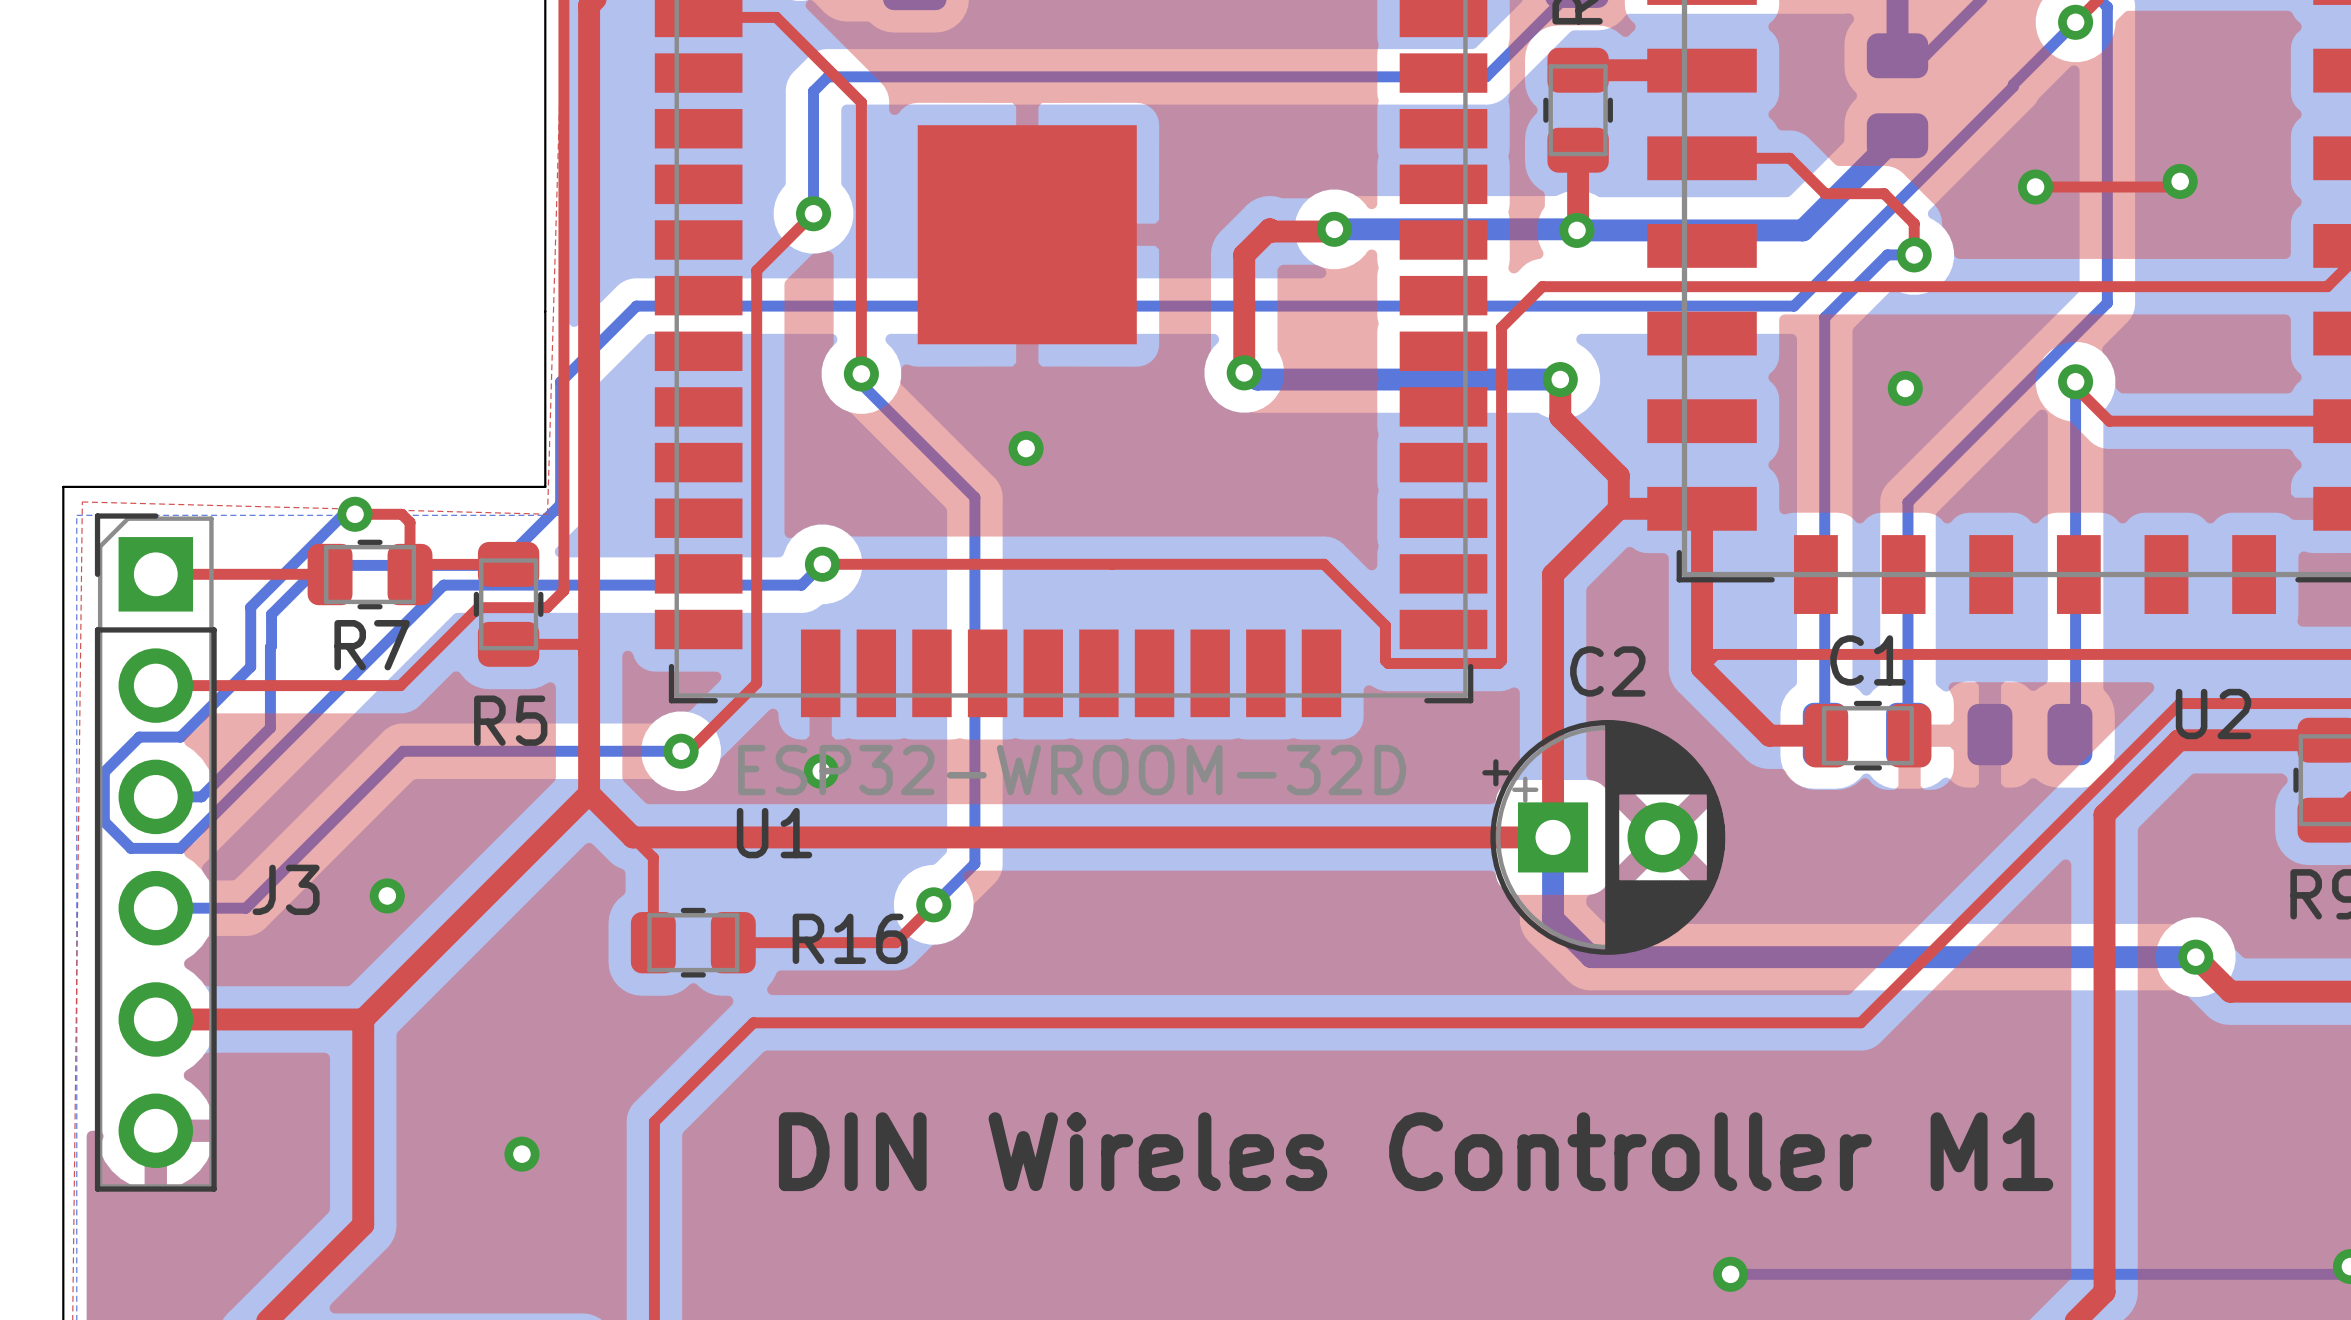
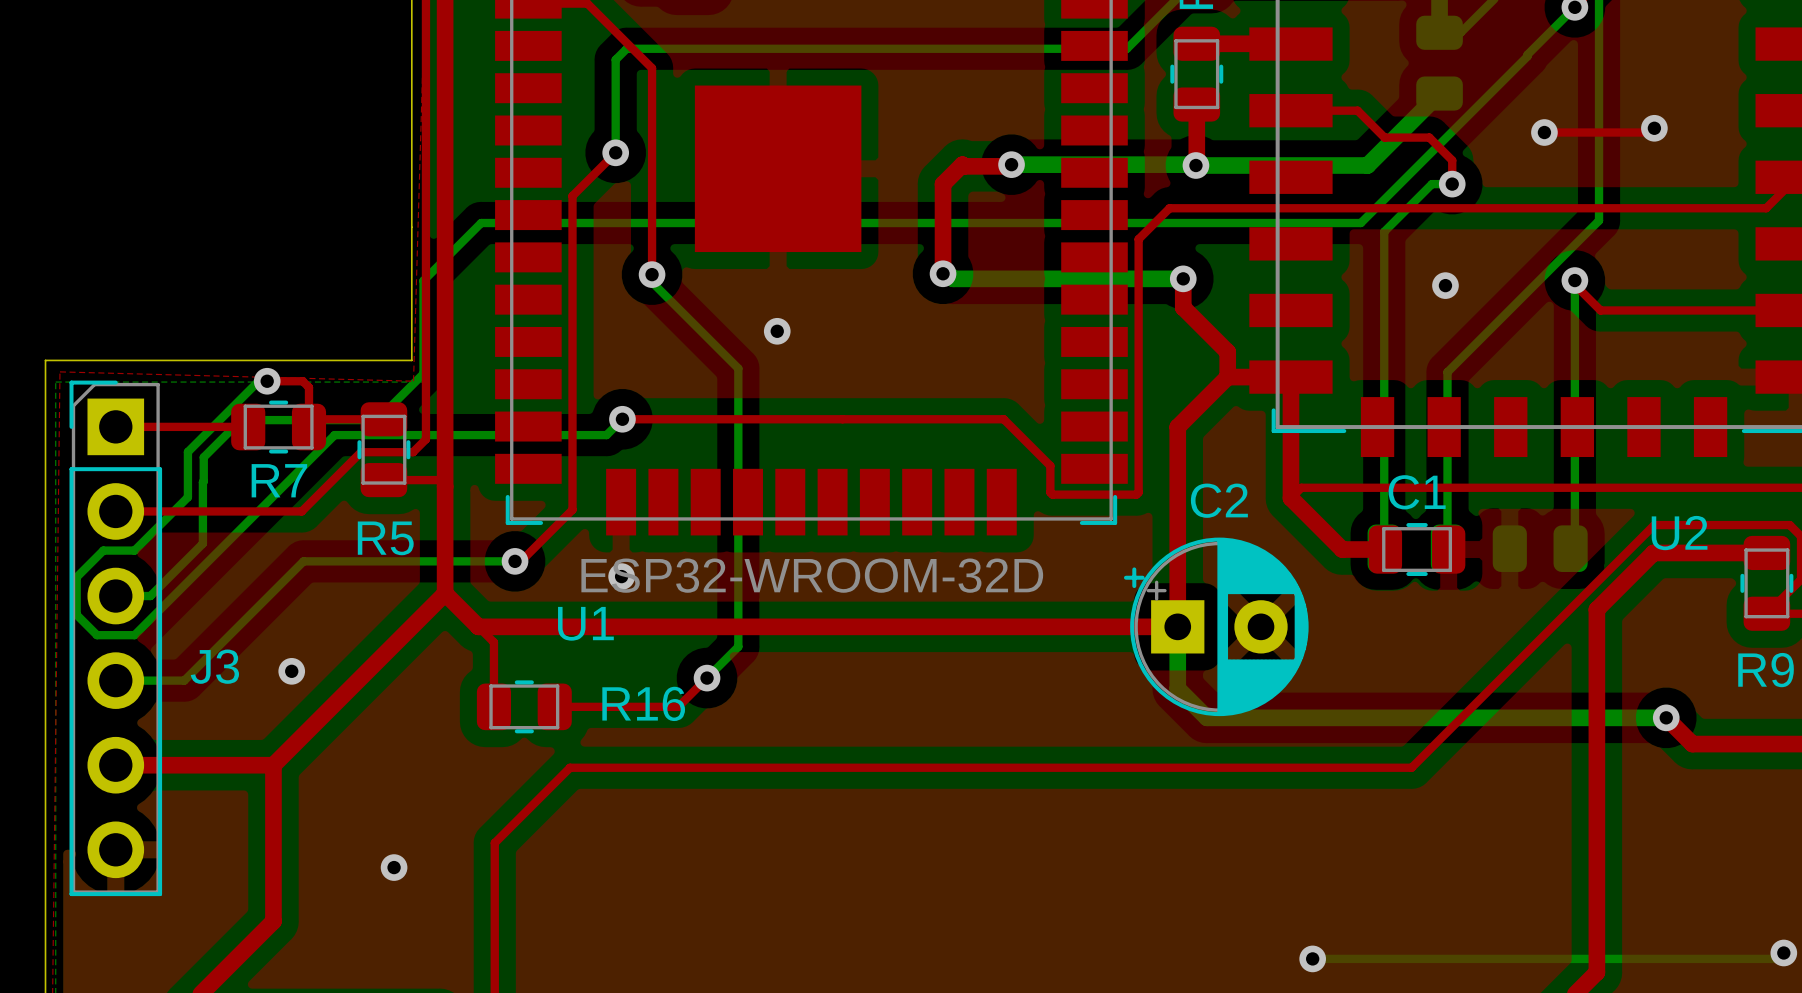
text: DIN Wireles Controller M1 (1416, 1151) -> none

